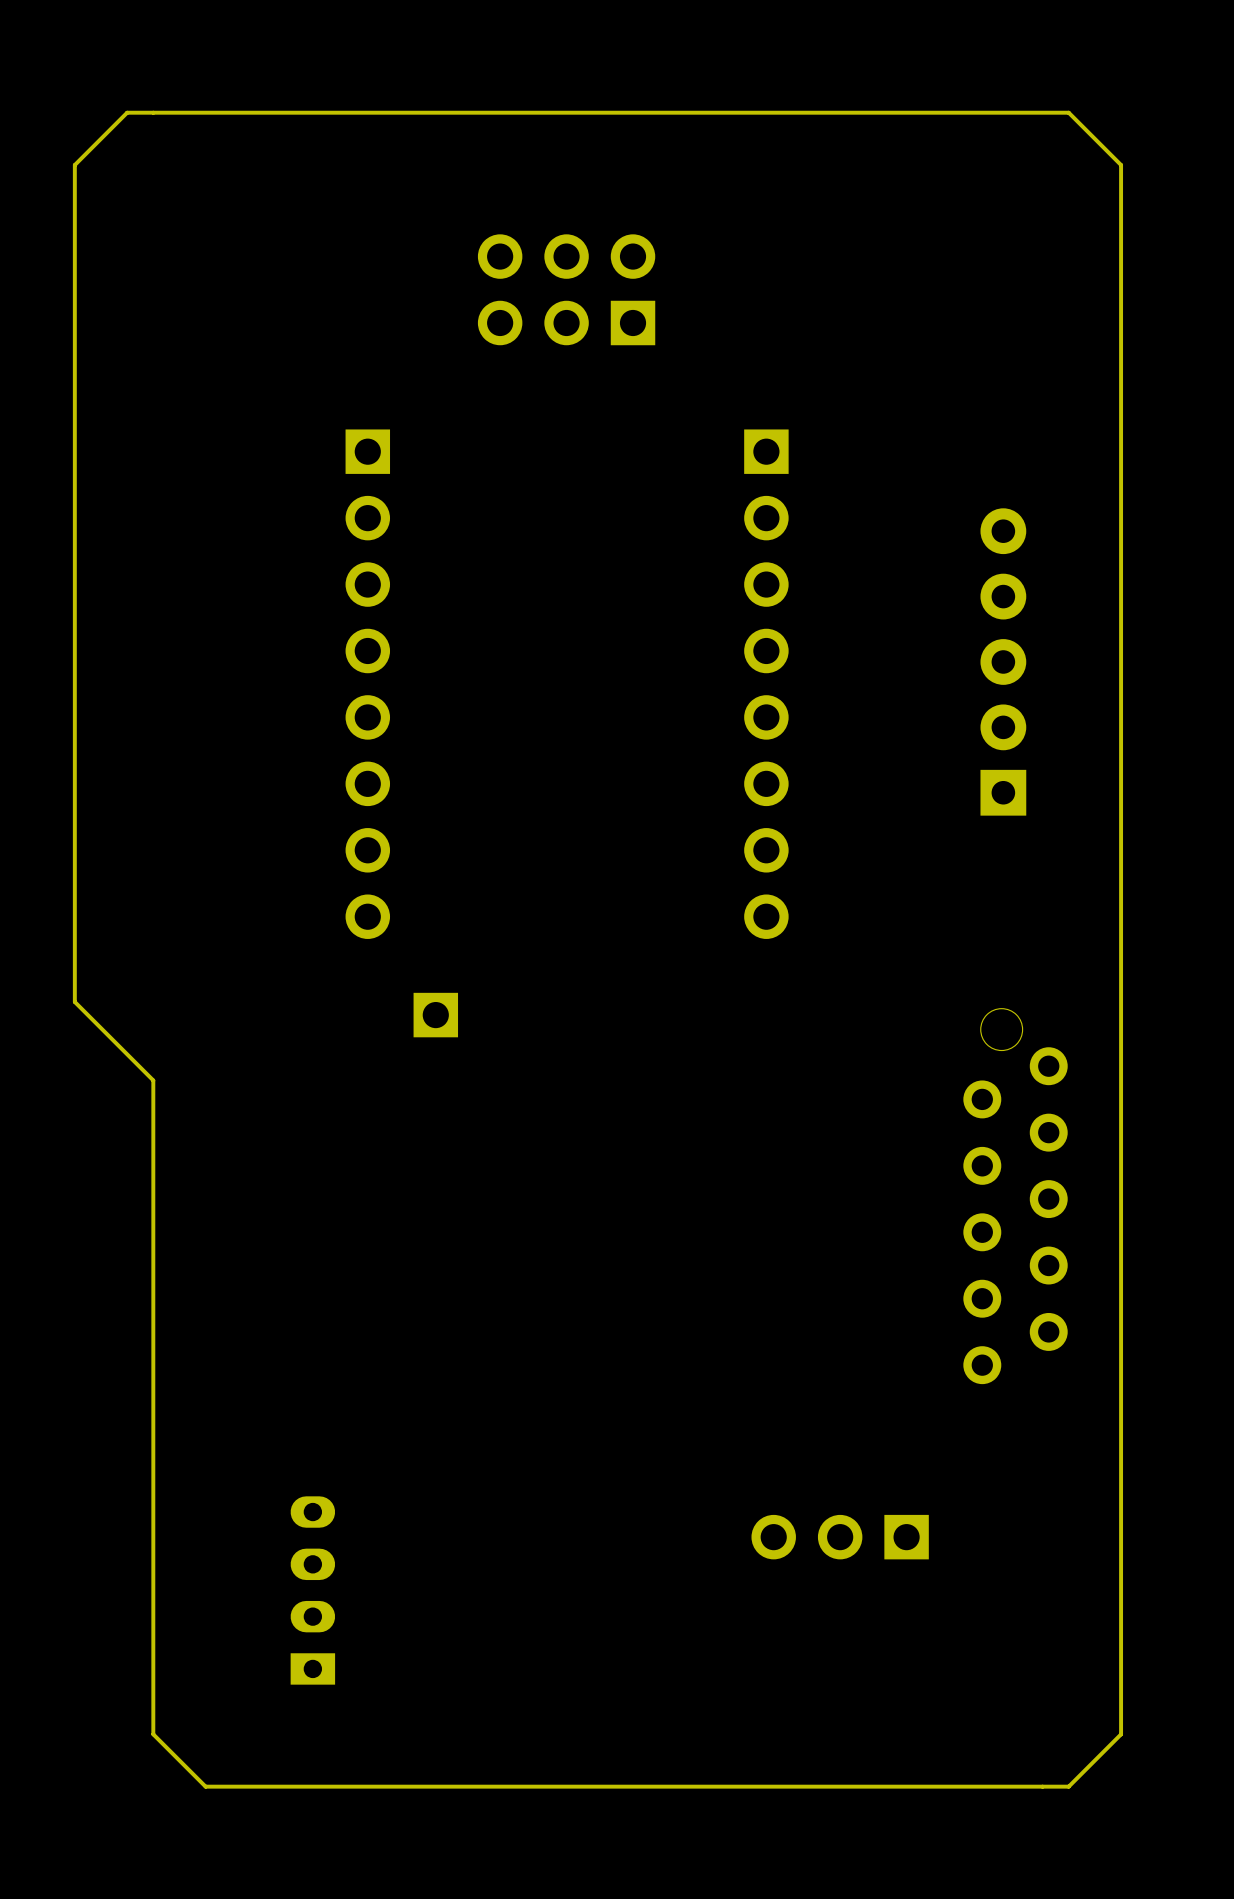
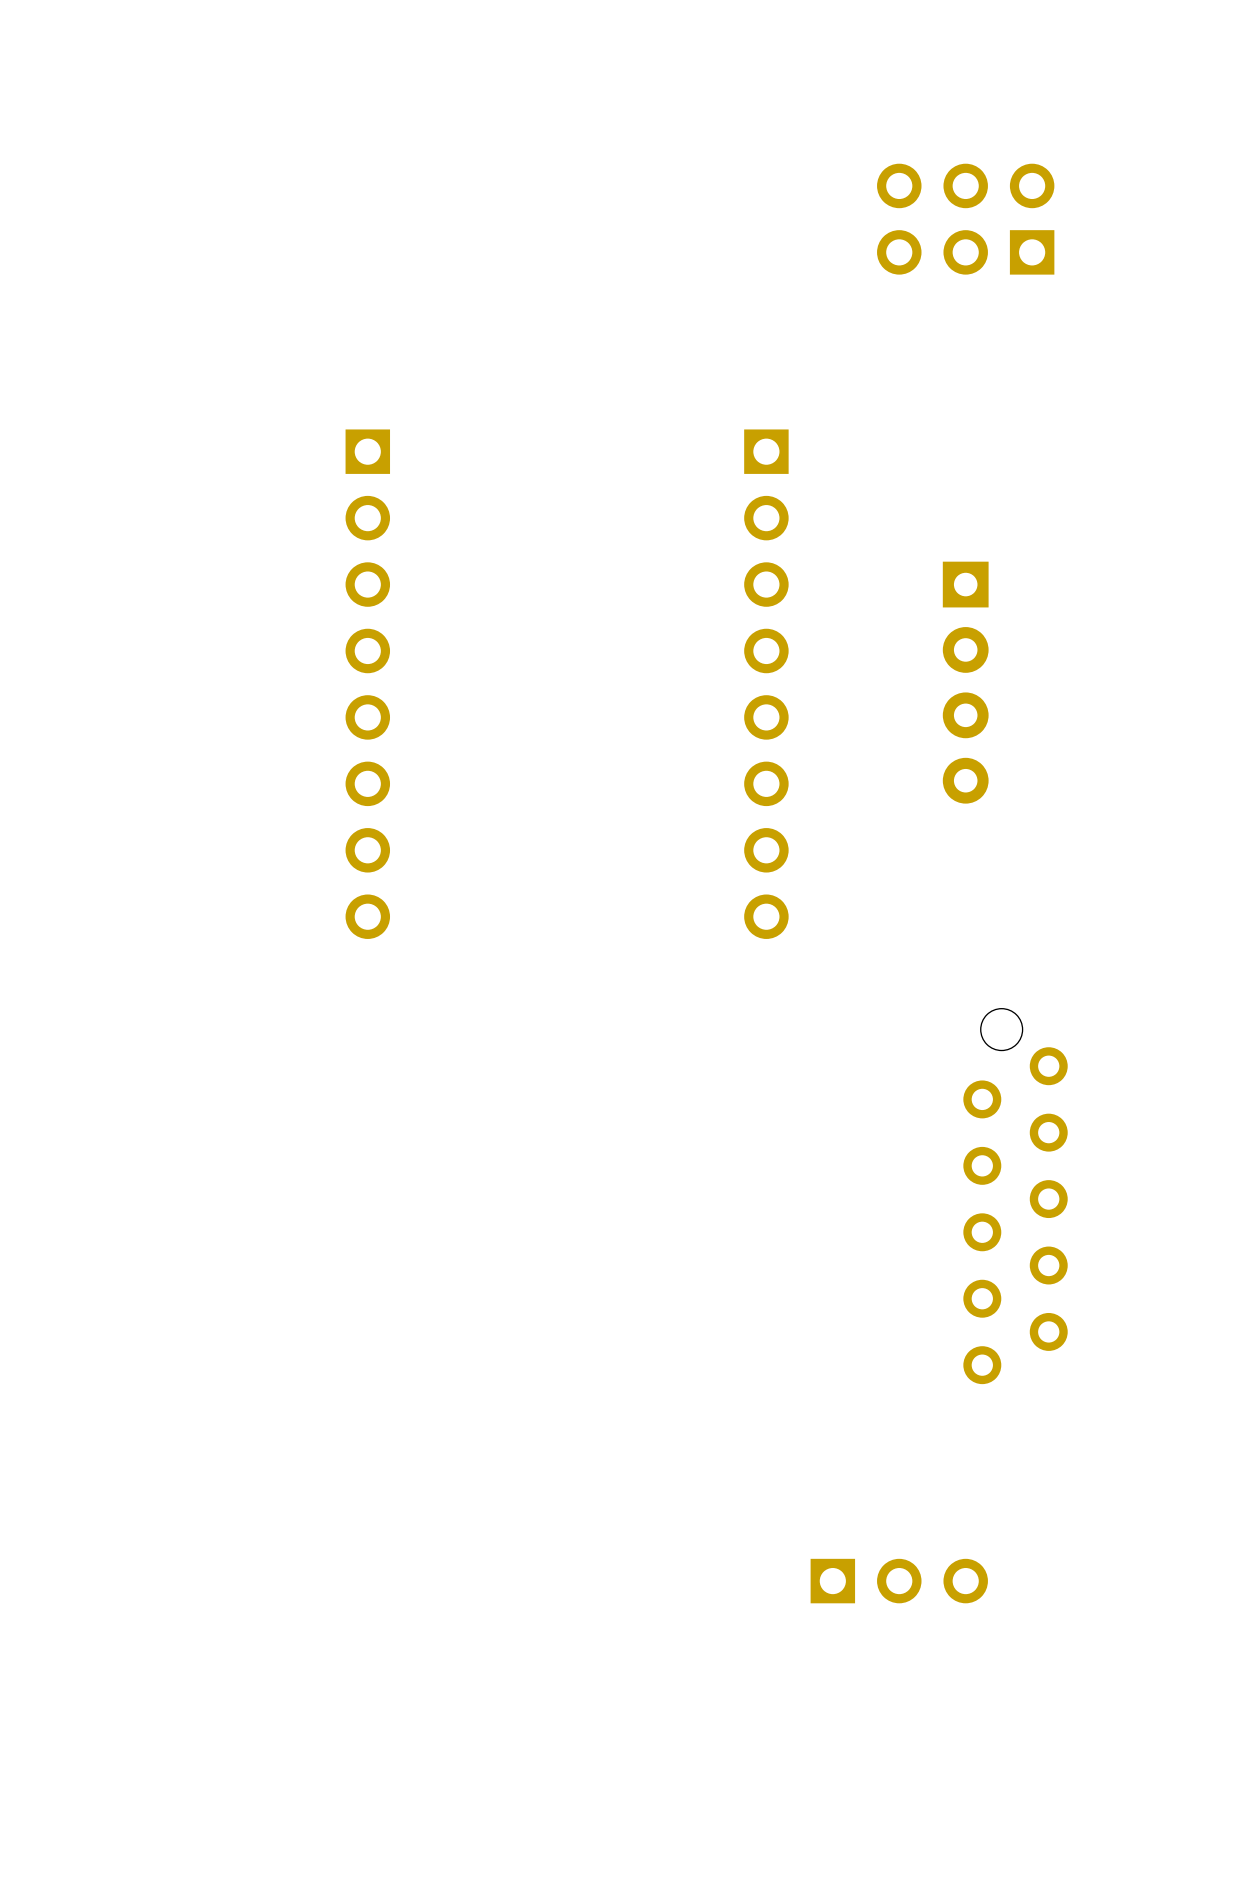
board edge: (1068, 112) (127, 112) (74, 165) (74, 1001) (153, 1080) (153, 1734) (205, 1786) (1068, 1786) (1121, 1734) (1121, 165) (1068, 112) -> none
part position: (566, 289) -> (965, 219)
part: (1003, 661) -> none
part: none -> (965, 682)
part: (435, 1015) -> none
part rotation: 0° (840, 1537) -> 180° (899, 1581)
part: (312, 1590) -> none

